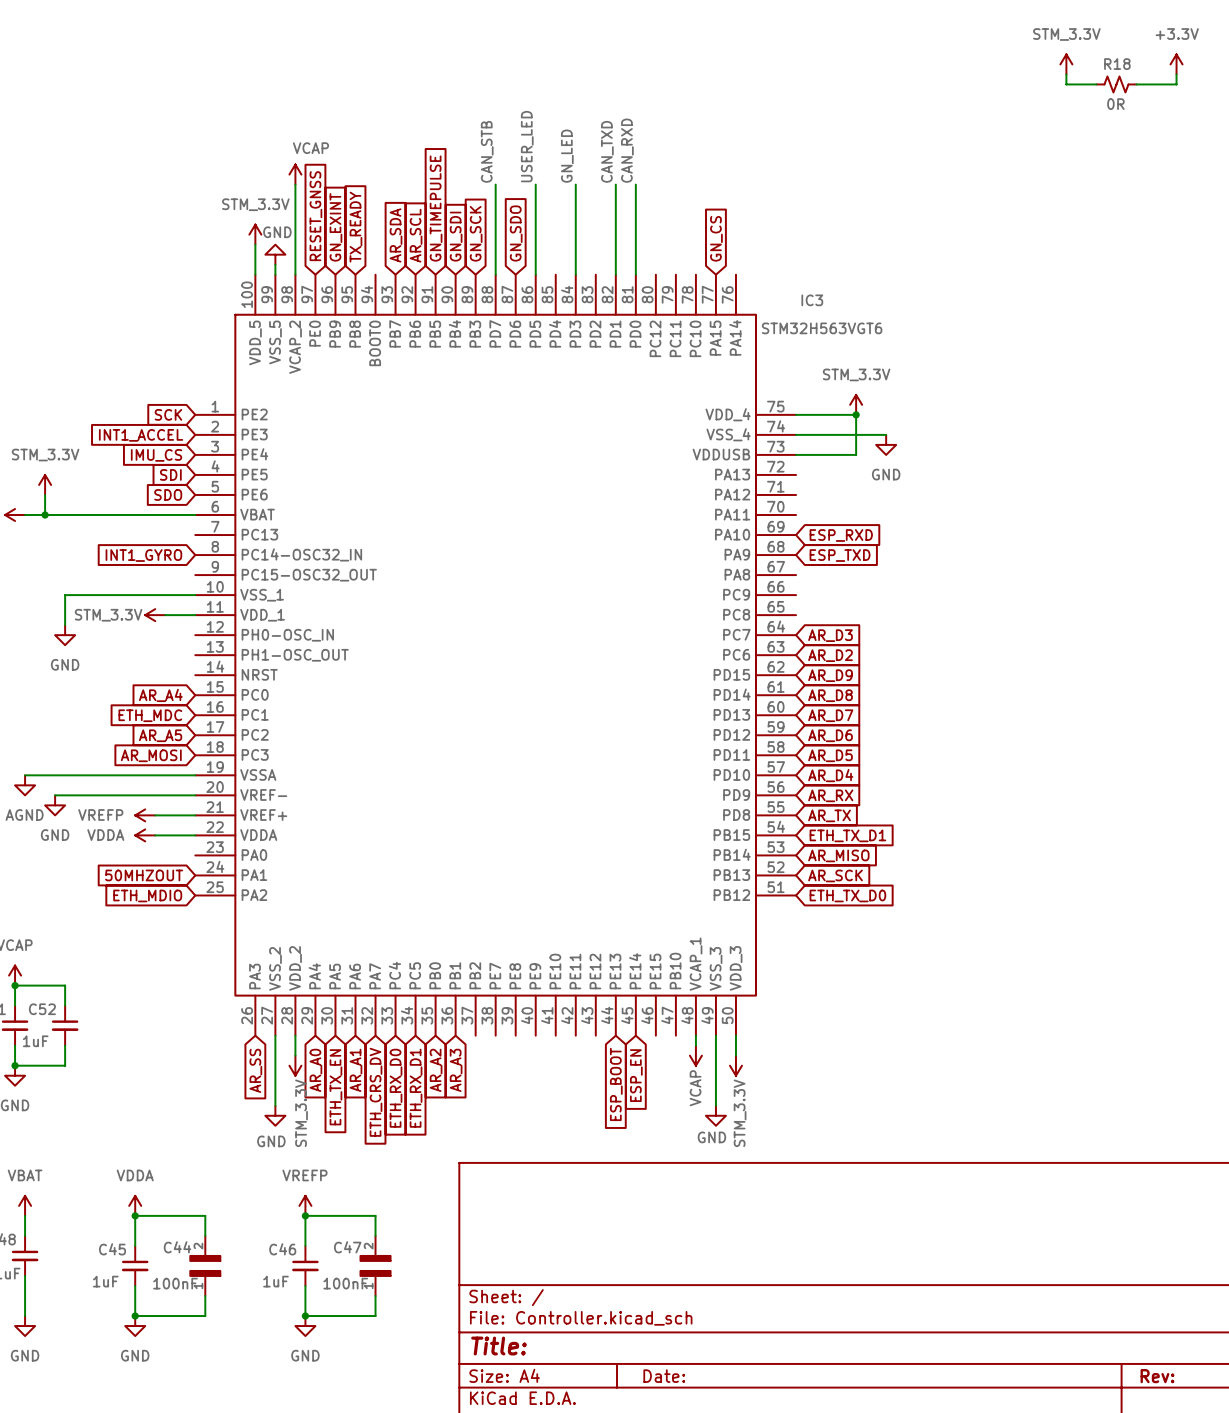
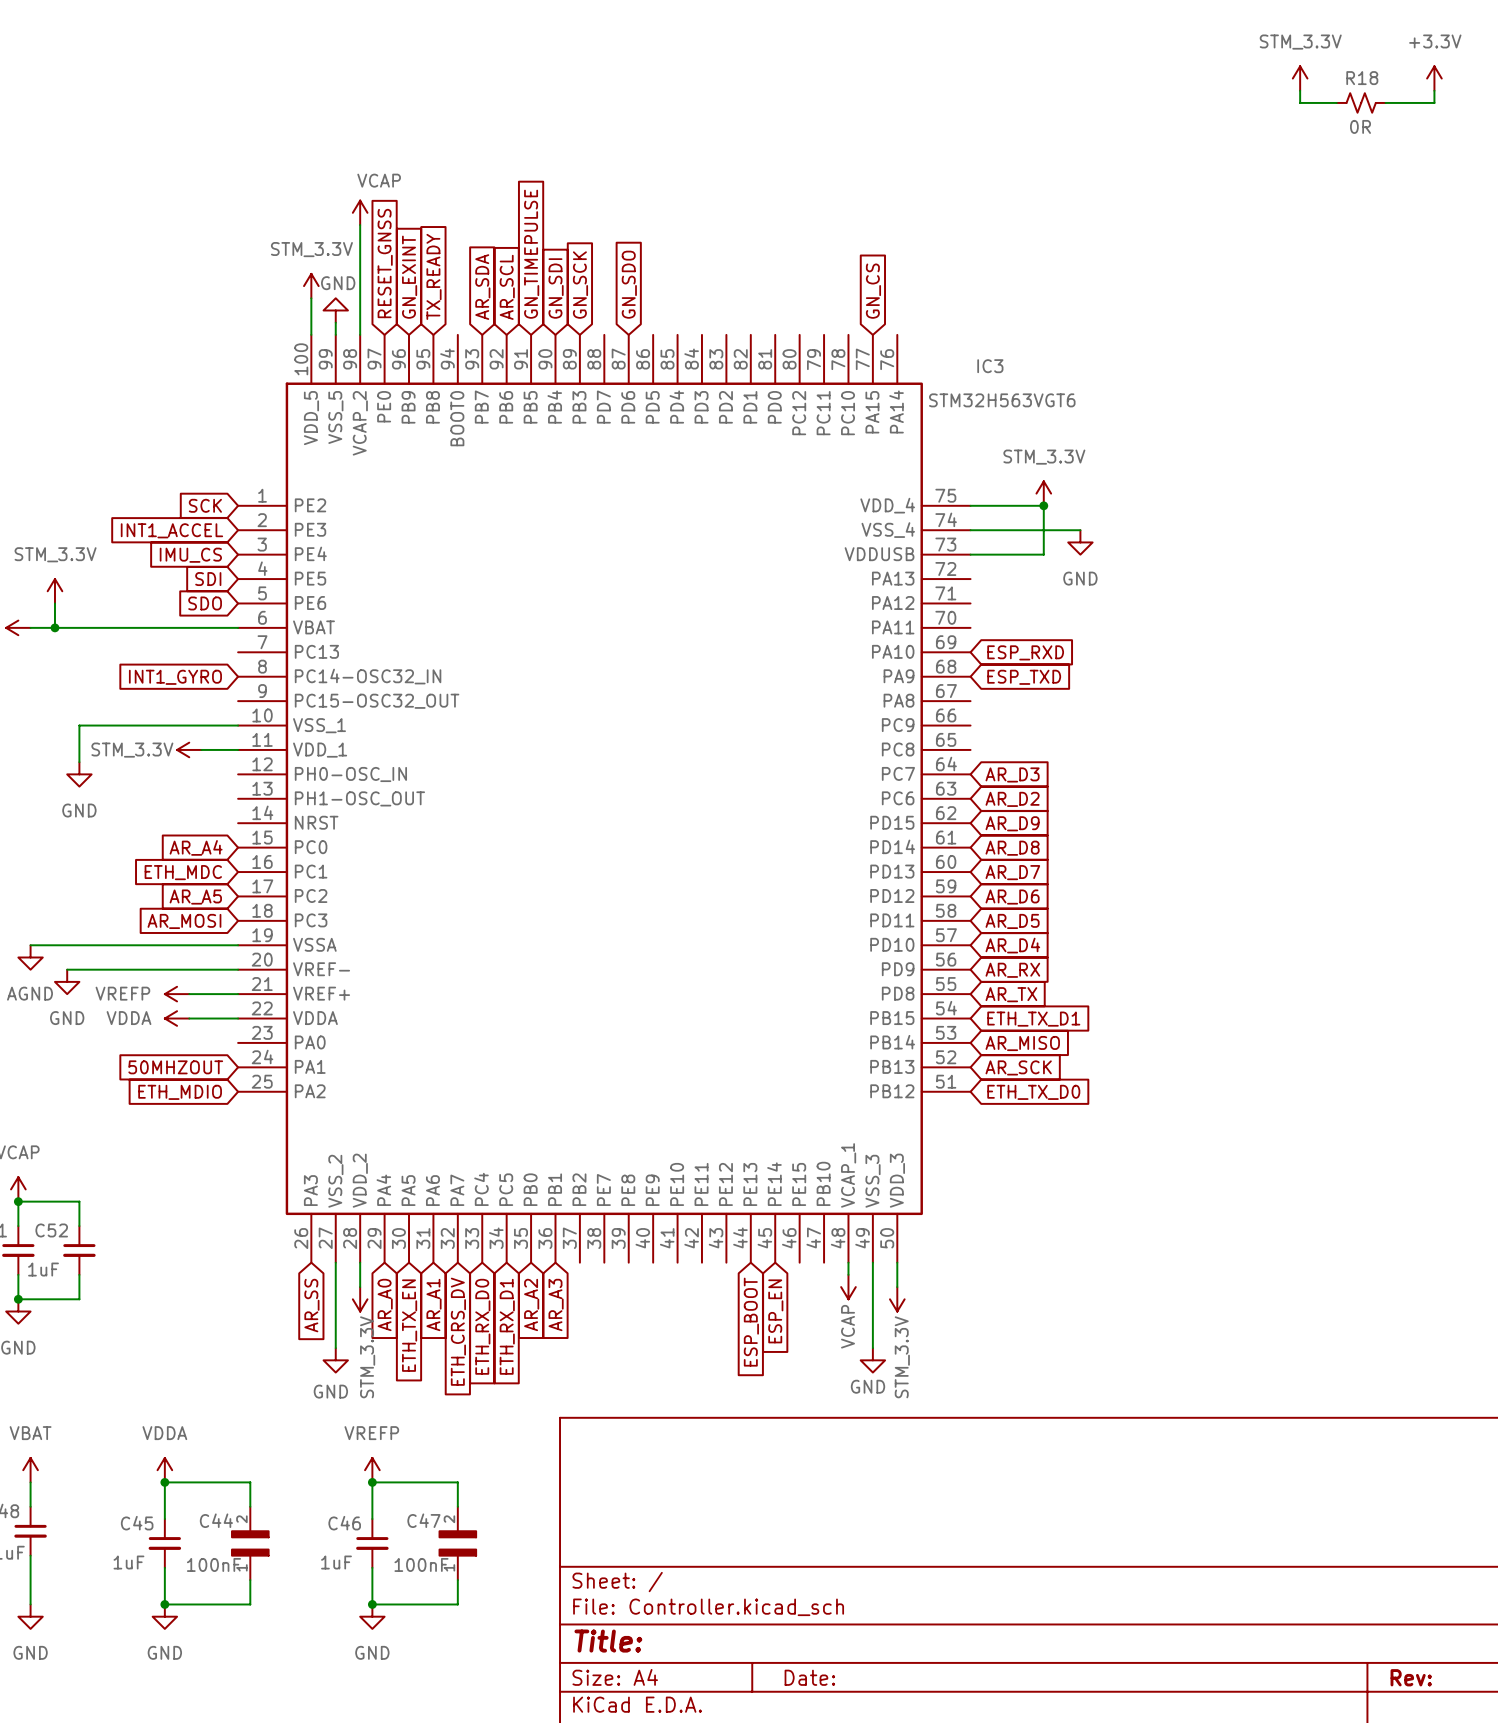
label: USER_LED (527, 146) -> none
label: CAN_RXD (627, 150) -> none
label: CAN_STB (487, 151) -> none
label: CAN_TXD (607, 151) -> none
label: GN_LED (567, 156) -> none
wire: (495, 184) (495, 274) -> none
wire: (535, 184) (535, 274) -> none
wire: (575, 184) (575, 274) -> none
wire: (615, 184) (615, 274) -> none
wire: (635, 184) (635, 274) -> none

